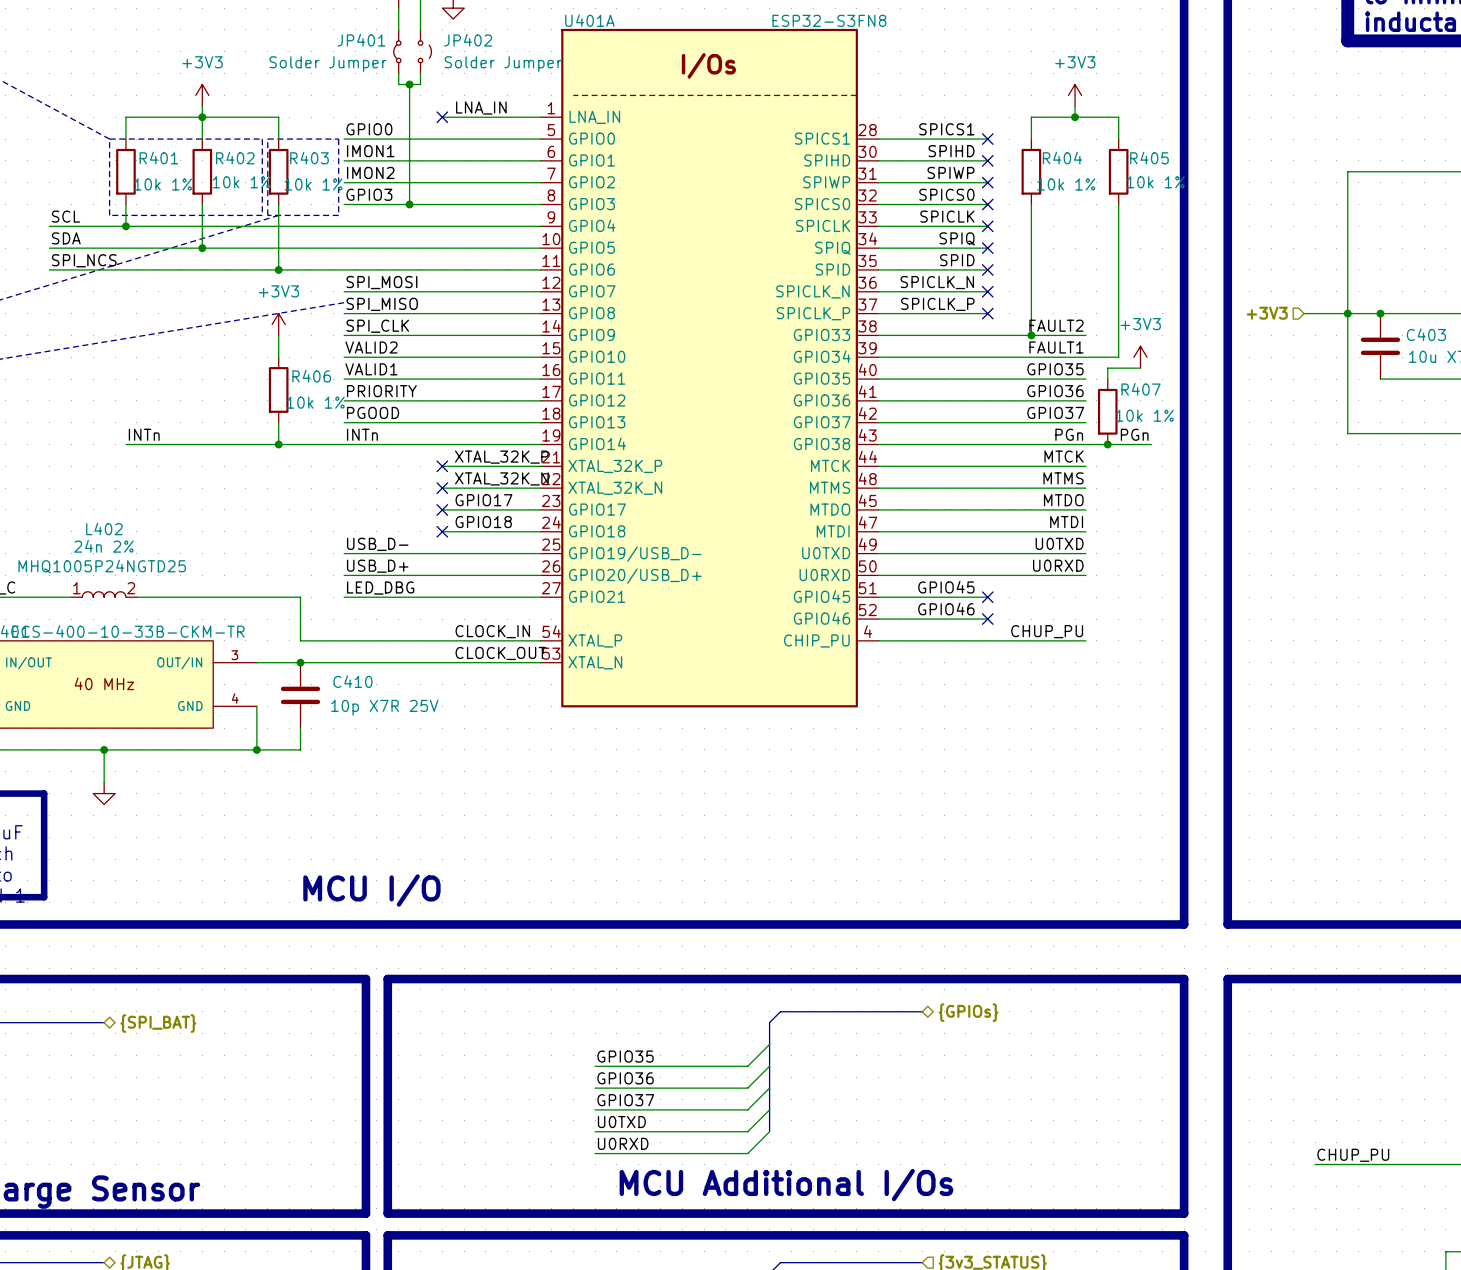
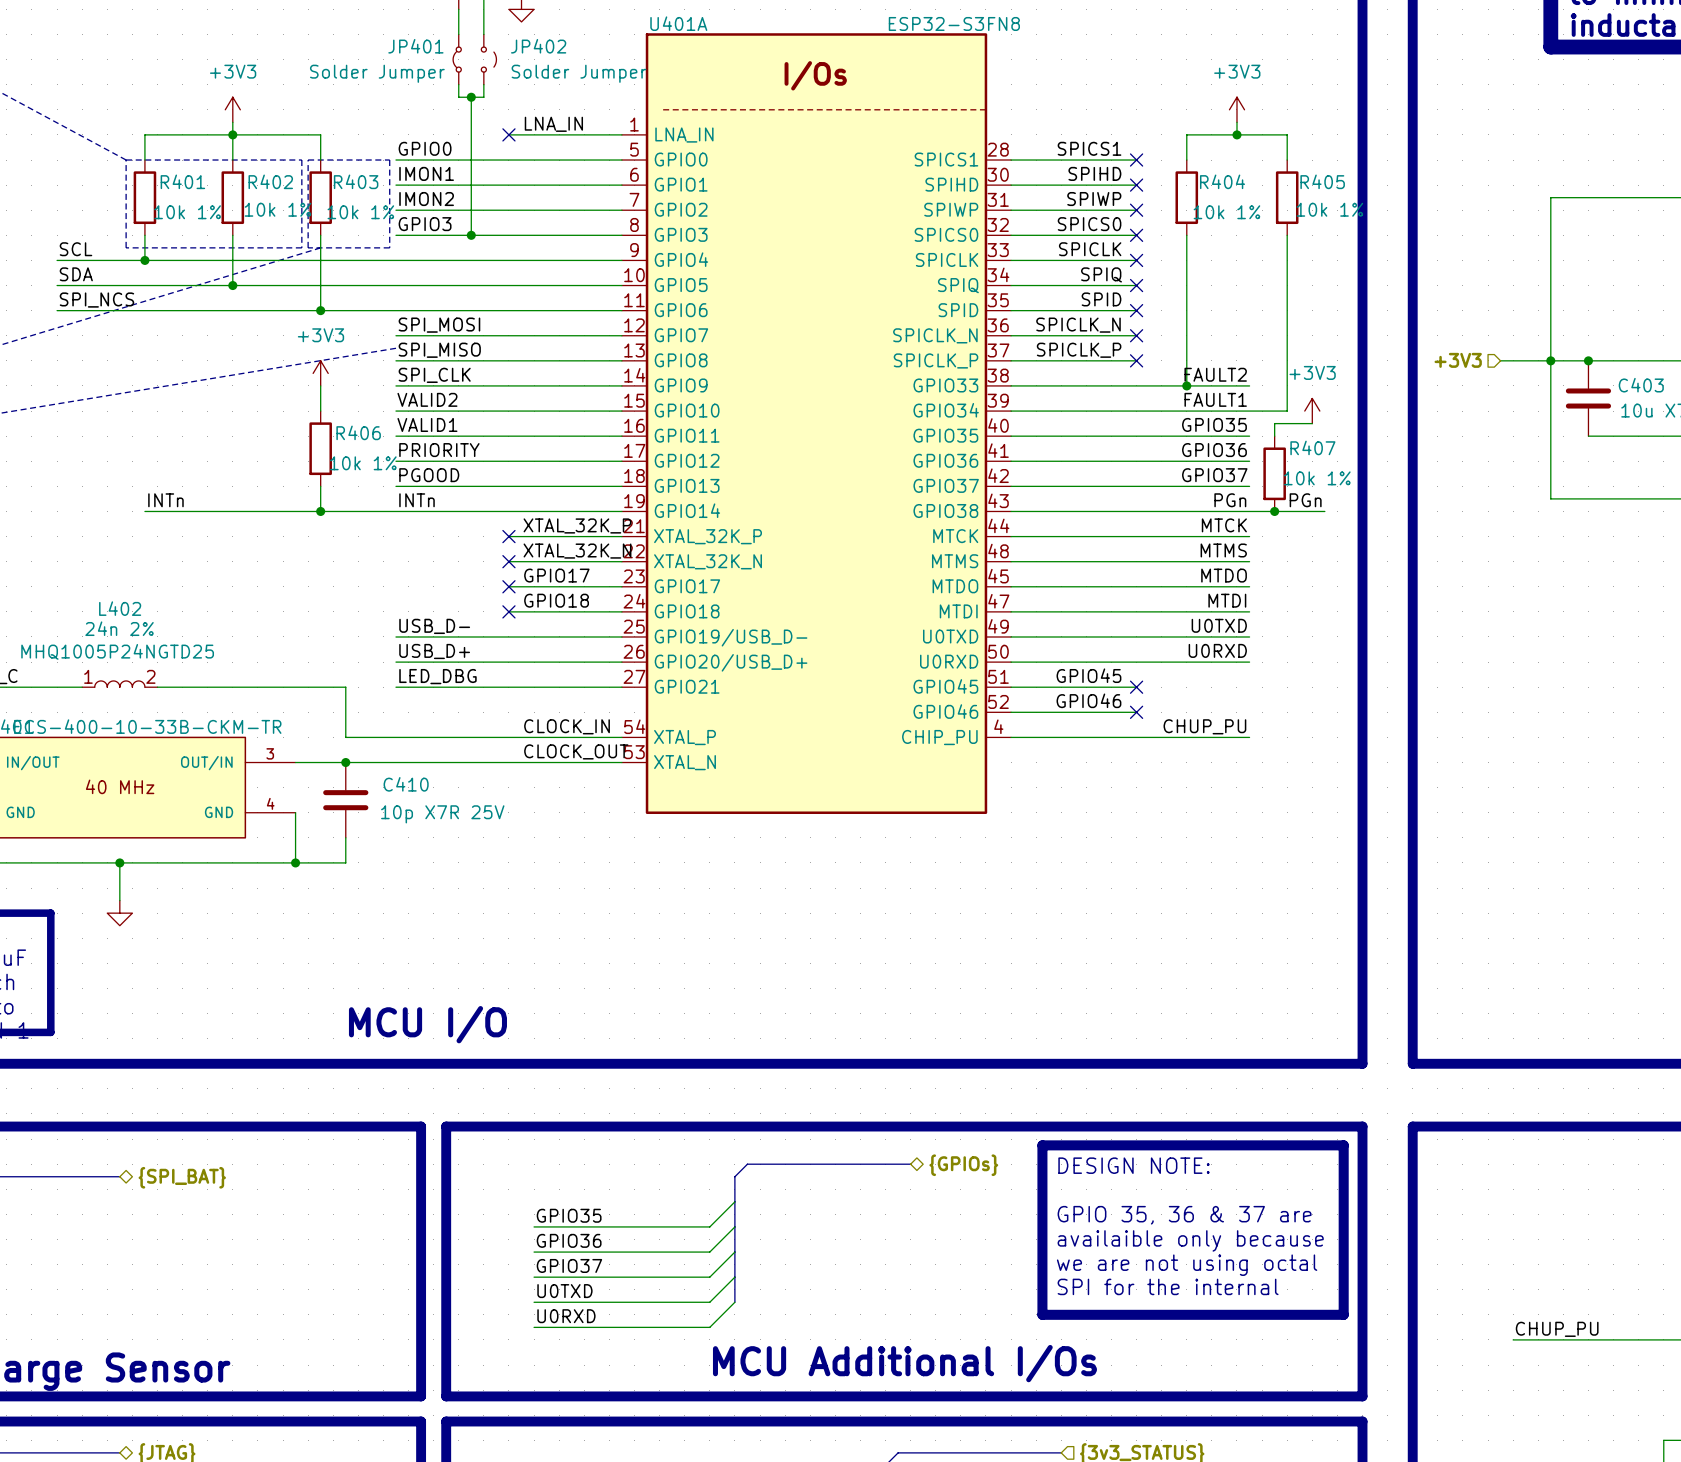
line: none -> (1042, 1145) (1343, 1145) (1343, 1314) (1042, 1314) (1042, 1145)
bus: (780, 1011) (769, 1022) (769, 1131) -> (898, 1164) (747, 1164) (734, 1176) (734, 1302)
bus: (791, 1011) (922, 1011) -> none
hierarchical label position: {GPIOs} (968, 1012) -> {GPIOs} (963, 1165)
text: none -> DESIGN NOTE: (1134, 1165)
wire: (769, 1044) (747, 1066) (616, 1066) -> (734, 1201) (709, 1226)
label position: GPIO35 (625, 1056) -> GPIO35 (569, 1215)
text: none -> GPIO 35, 36 & 37 are (1184, 1215)
wire: none -> (534, 1226) (684, 1226)
wire: (769, 1066) (747, 1088) (616, 1088) -> (734, 1226) (709, 1252)
label position: GPIO36 (625, 1078) -> GPIO36 (569, 1240)
text: none -> availaible only because (1190, 1240)
wire: none -> (534, 1252) (684, 1252)
wire: (769, 1088) (747, 1109) (616, 1109) -> (734, 1252) (709, 1277)
text: none -> we are not using octal (1187, 1265)
label position: GPIO37 (625, 1100) -> GPIO37 (569, 1265)
wire: none -> (534, 1277) (684, 1277)
wire: (769, 1109) (747, 1131) (616, 1131) -> (734, 1277) (709, 1302)
text: none -> SPI for the internal (1168, 1286)
label position: U0TXD (621, 1122) -> U0TXD (564, 1291)
wire: none -> (534, 1302) (684, 1302)
wire: (769, 1131) (747, 1153) (616, 1153) -> (734, 1302) (709, 1327)
label position: U0RXD (623, 1143) -> U0RXD (566, 1316)
wire: none -> (534, 1327) (684, 1327)

